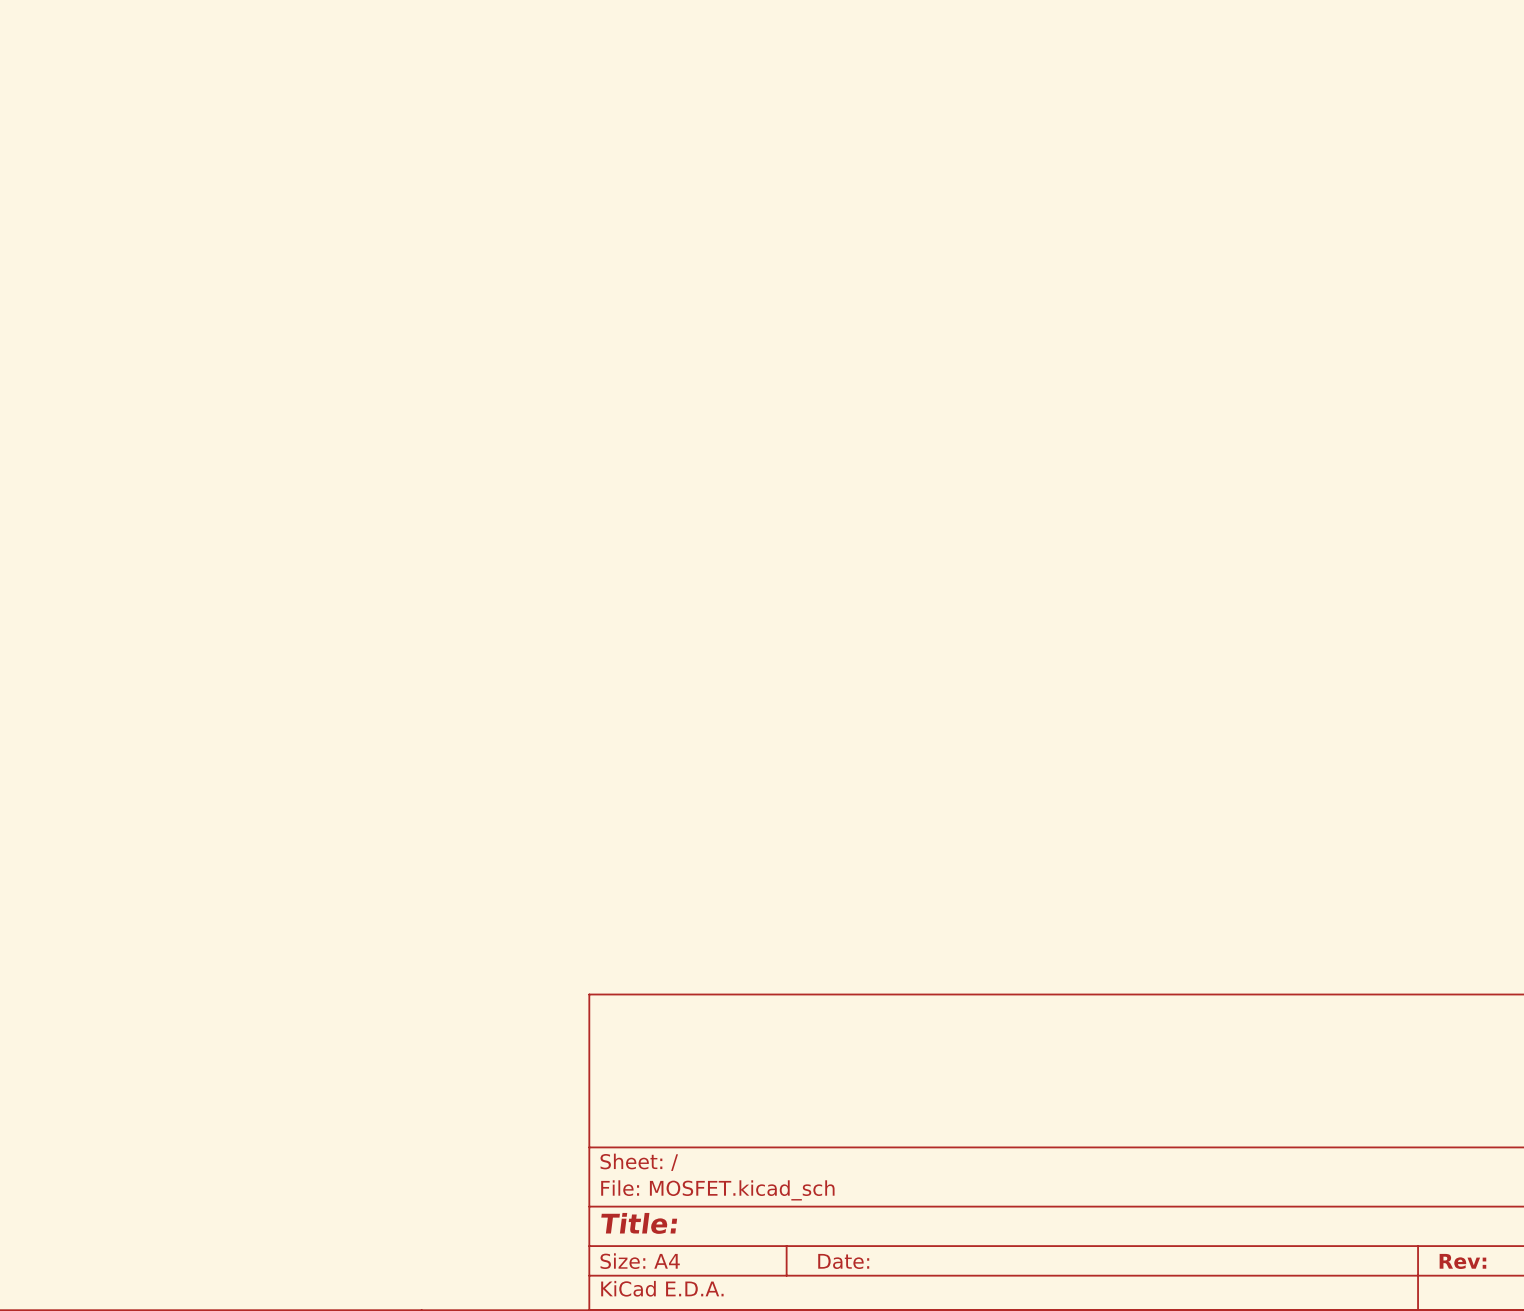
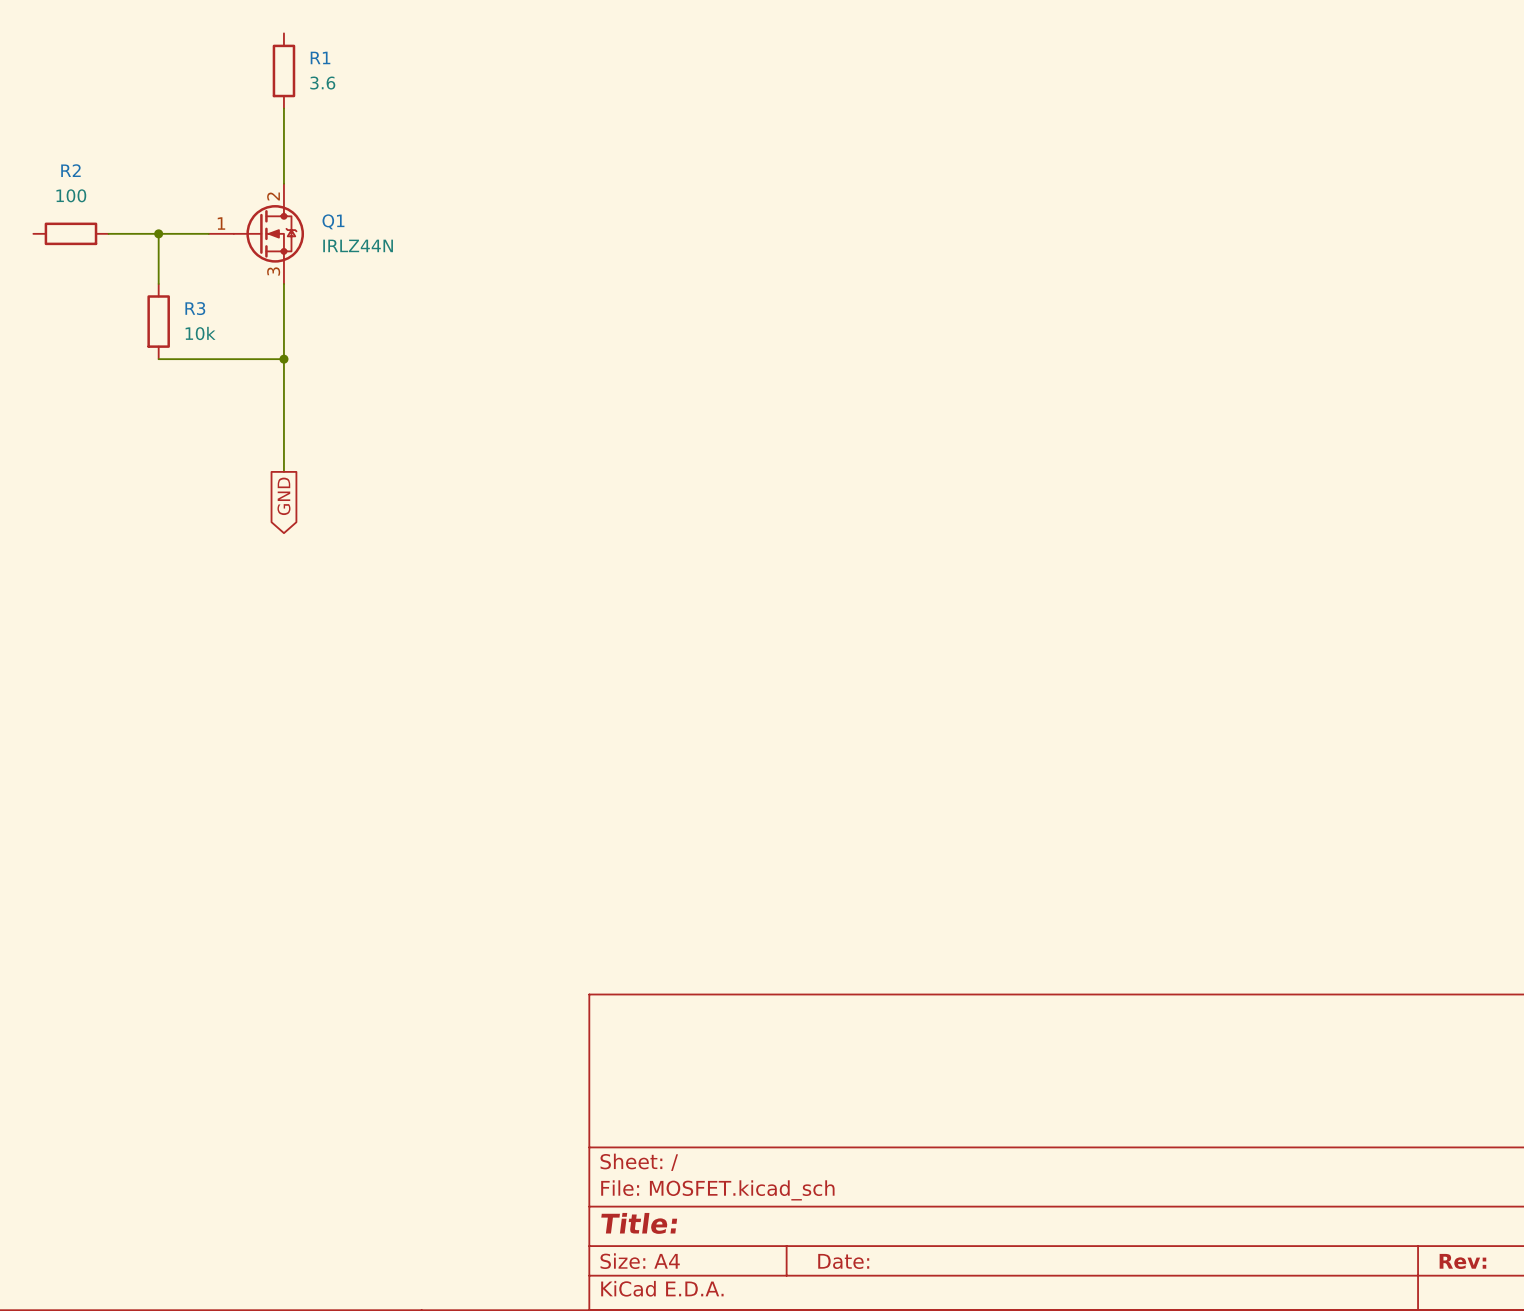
R1: none -> 3.6 (283, 70)
wire: none -> (283, 108) (283, 183)
R2: none -> 100 (70, 233)
wire: none -> (108, 233) (208, 233)
wire: none -> (158, 233) (158, 283)
junction: none -> (158, 233)
Q1: none -> IRLZ44N (256, 233)
wire: none -> (283, 283) (283, 471)
R3: none -> 10k (158, 321)
wire: none -> (158, 359) (283, 359)
junction: none -> (283, 359)
global label: none -> GND (283, 496)

